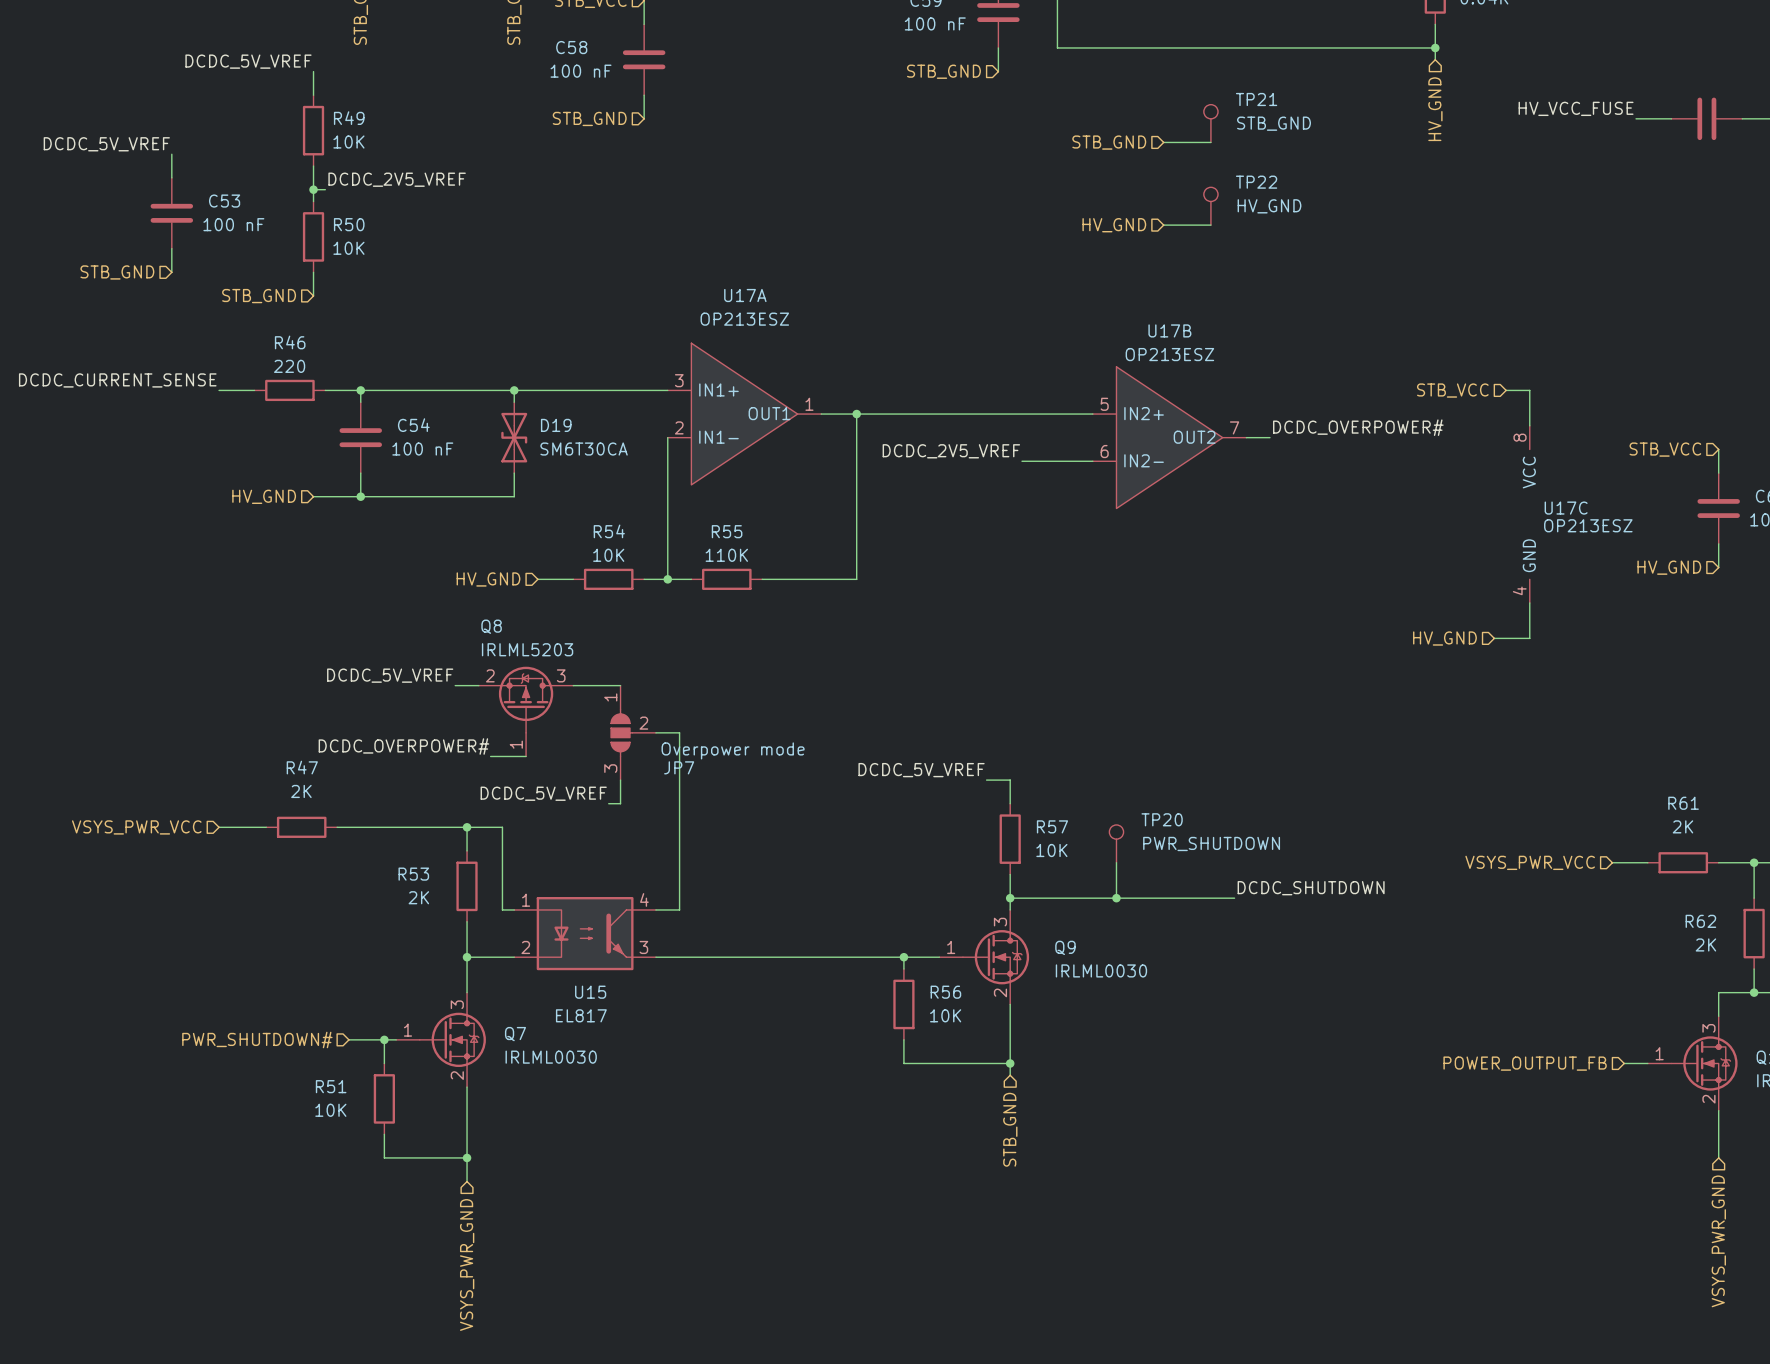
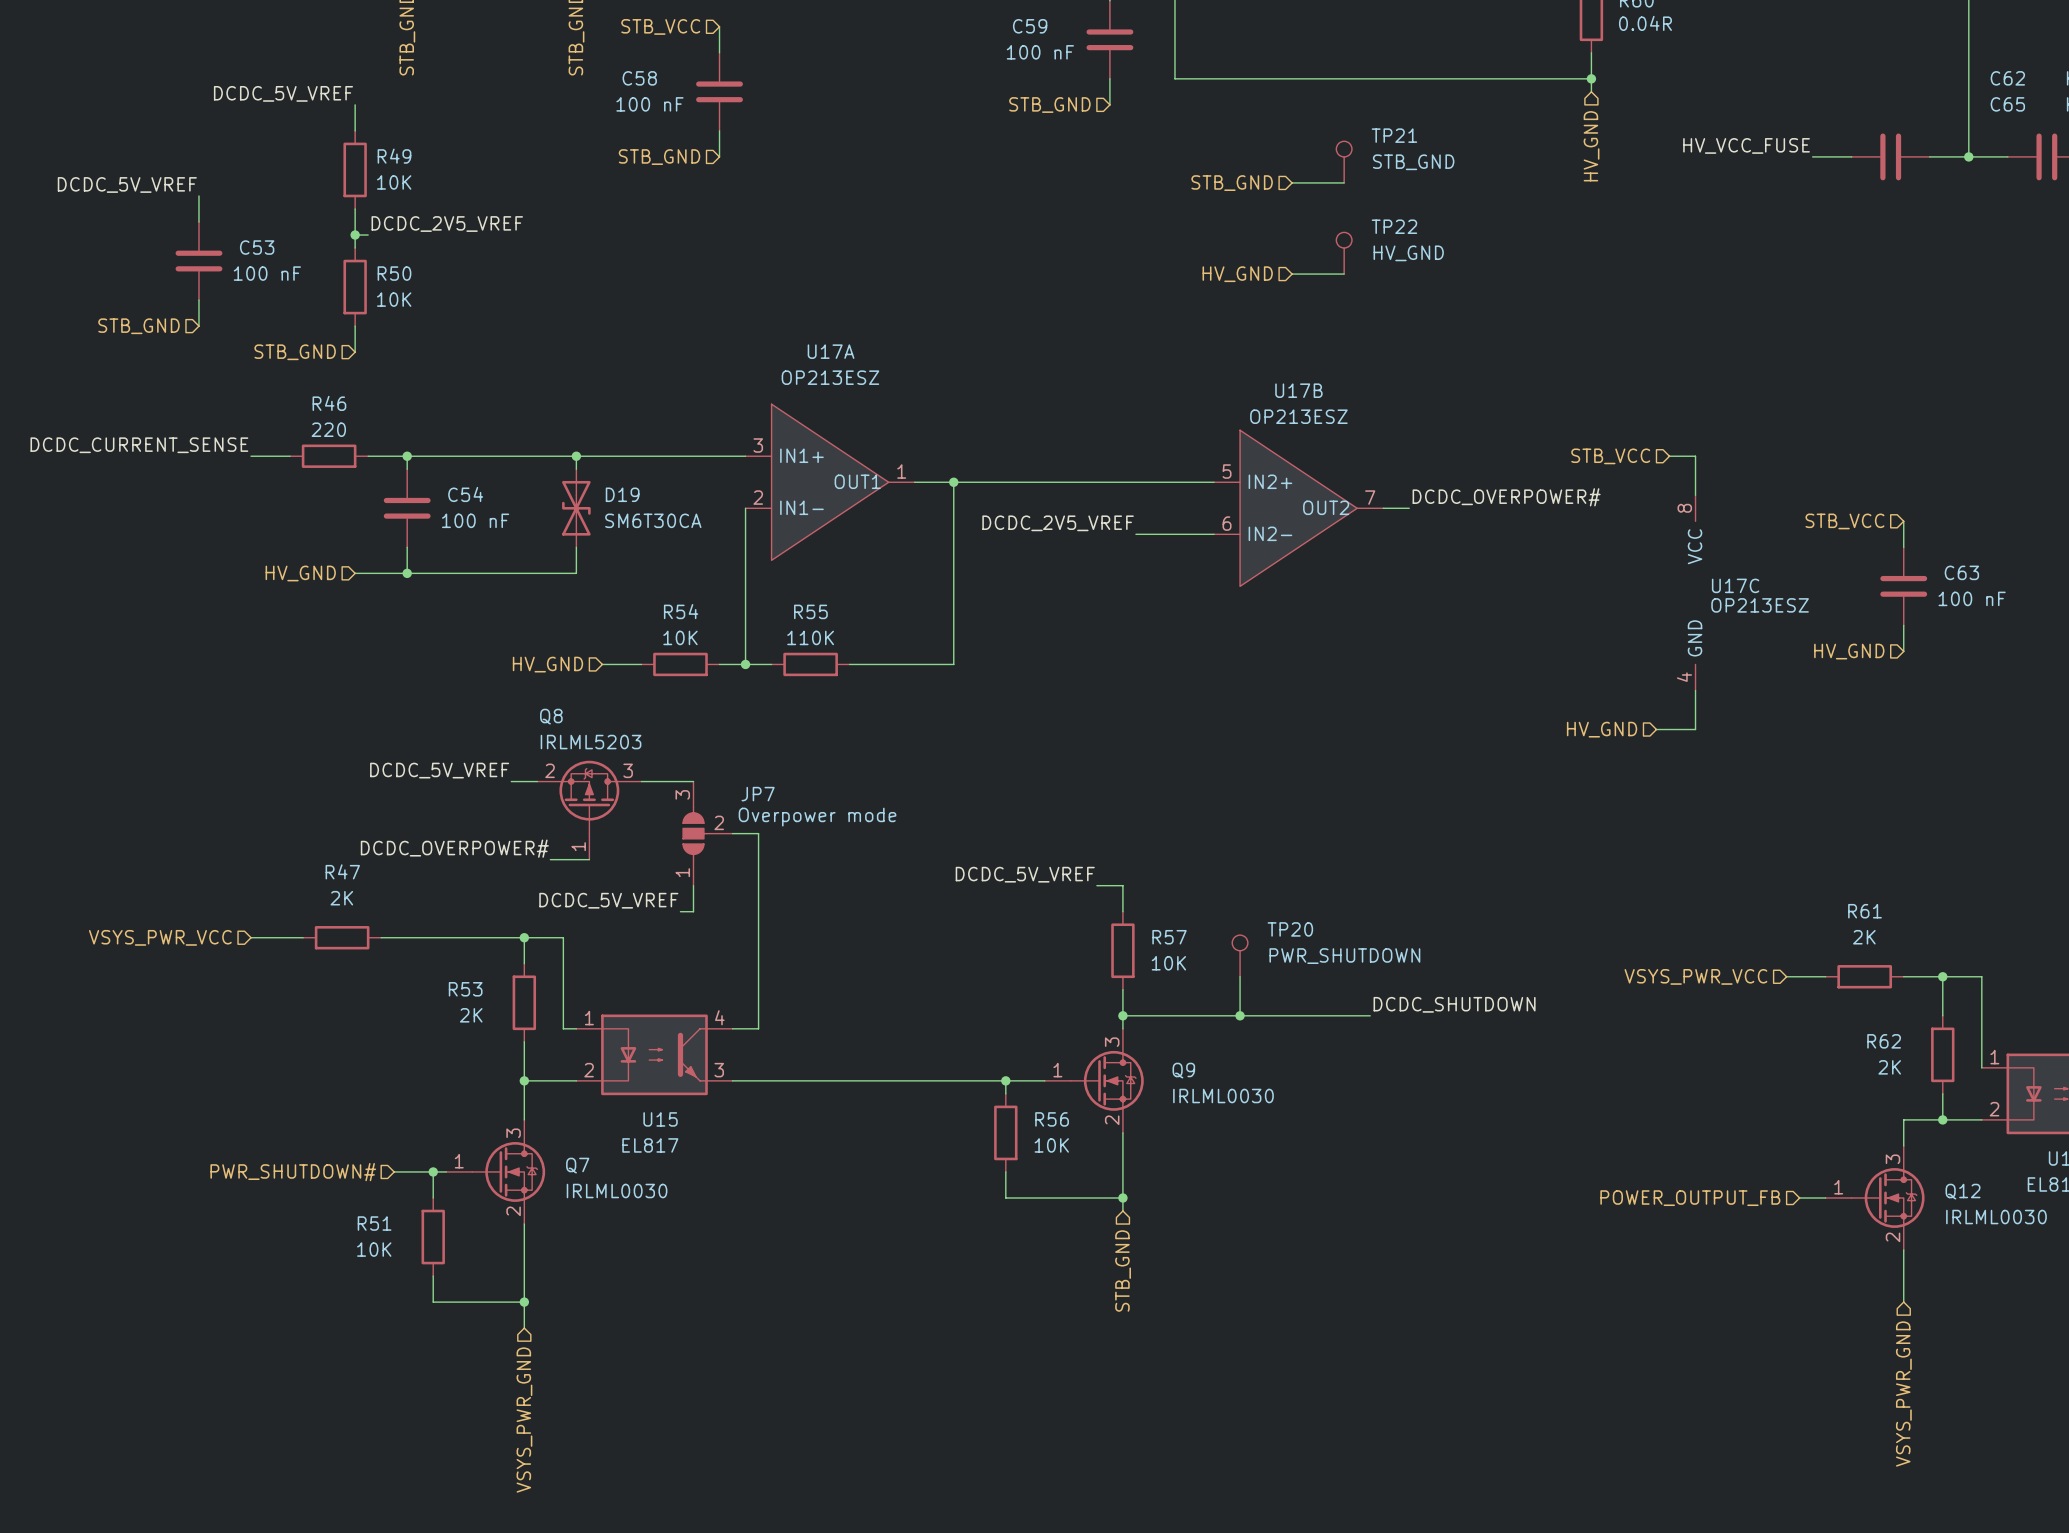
JP7 flip: as is (621, 732) -> up-down (694, 833)

